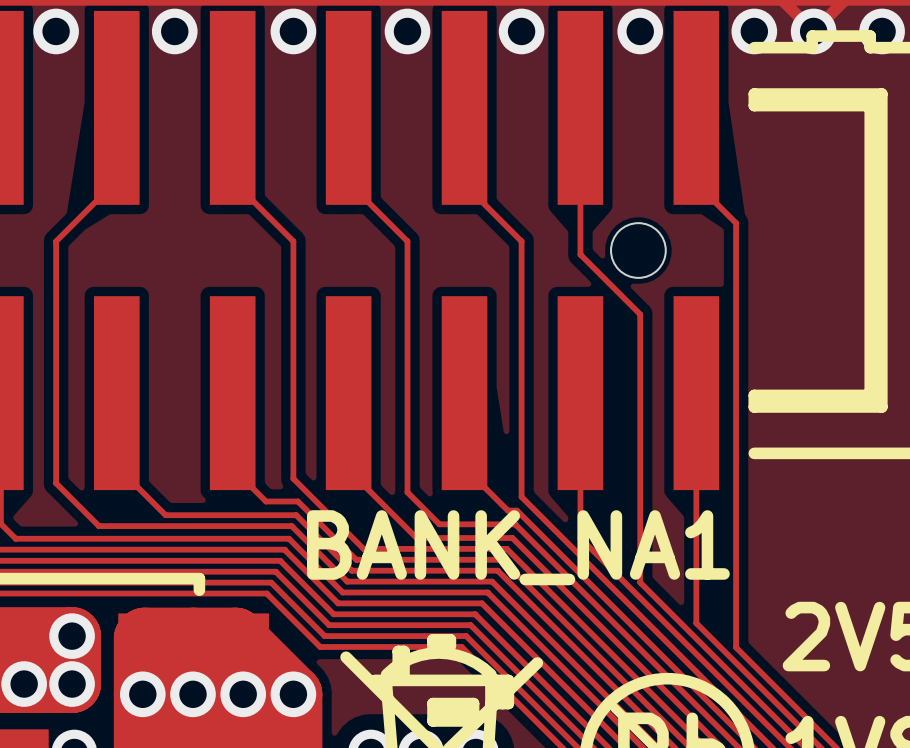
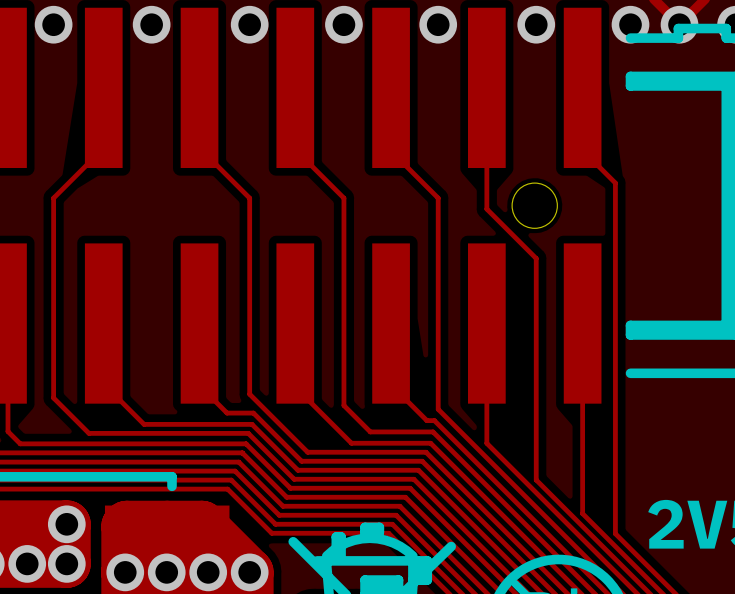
BANK_NA1 name: BANK_NA1 (518, 547) -> none

